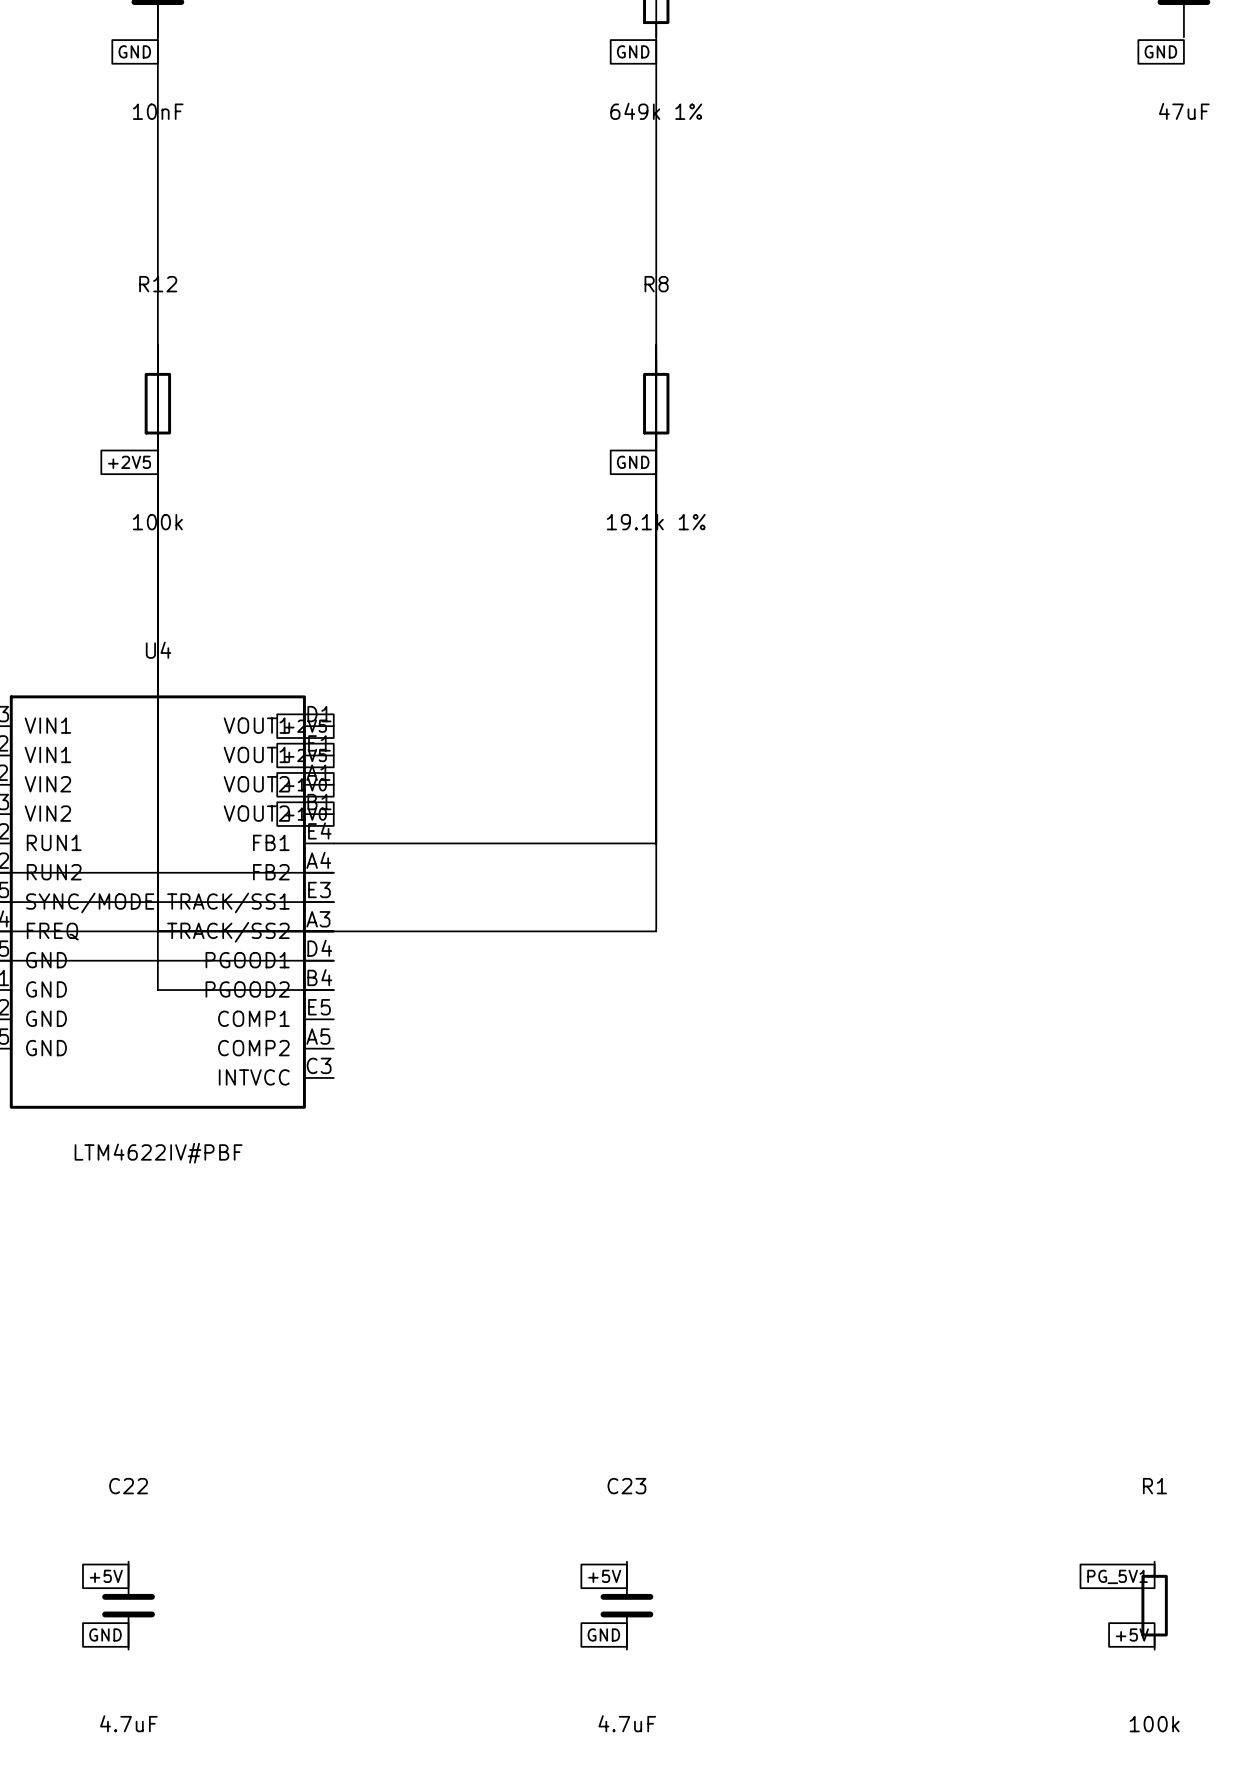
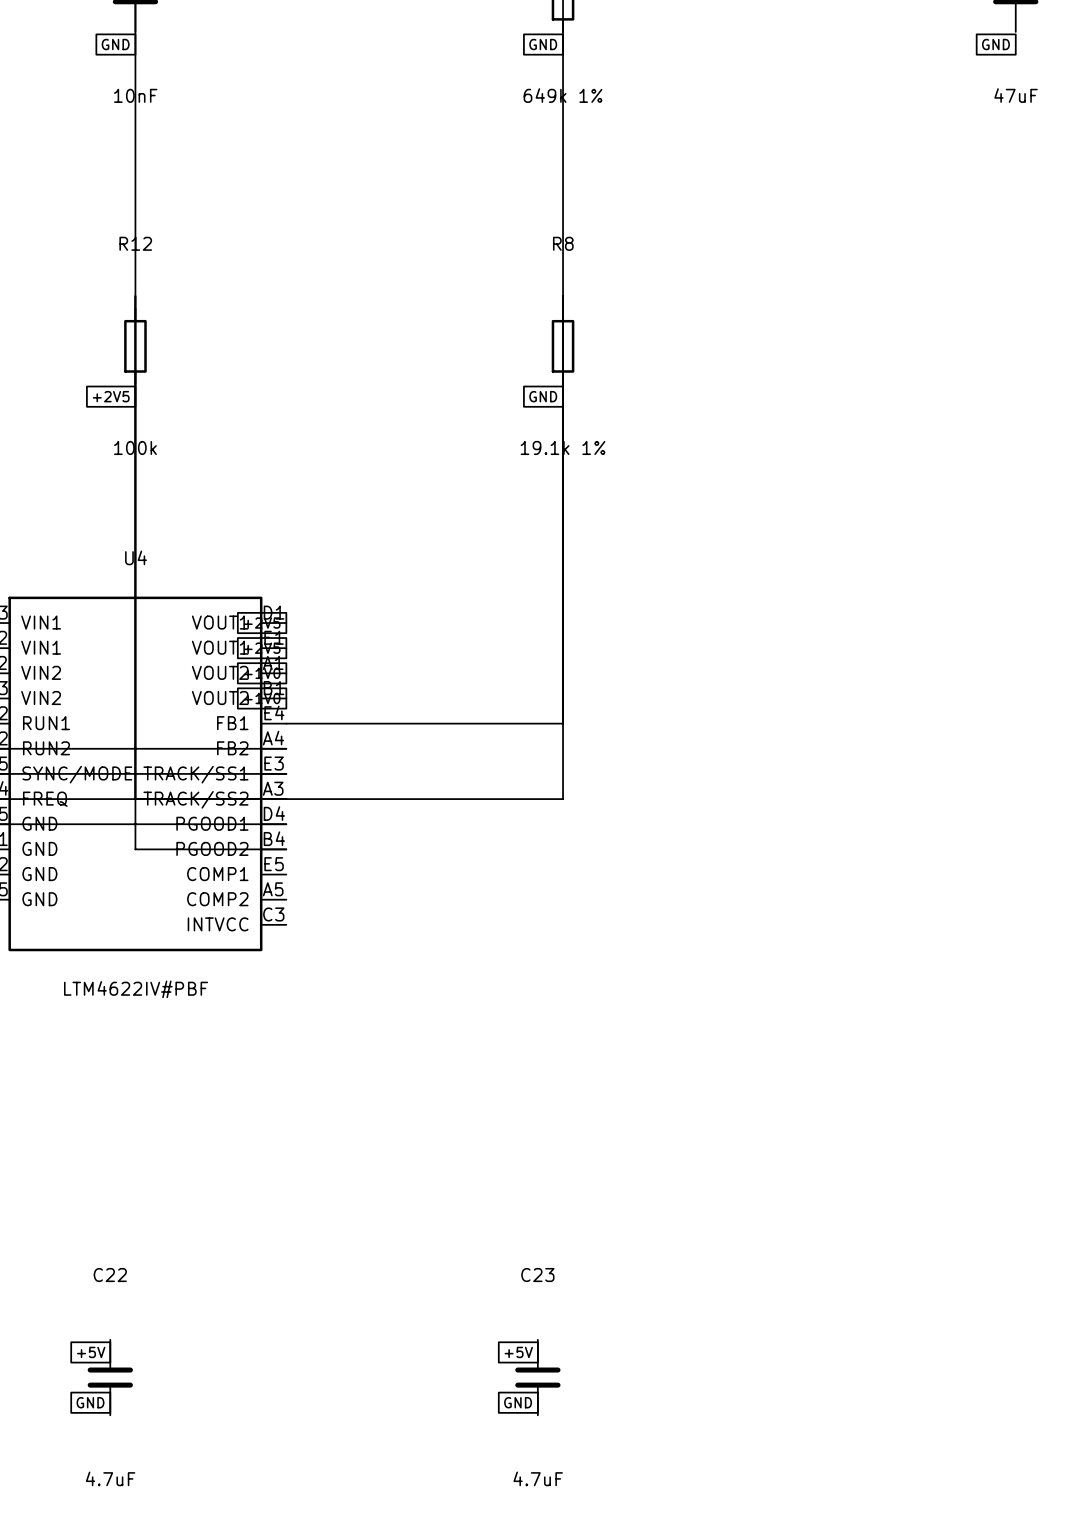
global label: PG_5V1 (1117, 1576) -> none
R1: 100k (1154, 1605) -> none
global label: +5V (1132, 1634) -> none

